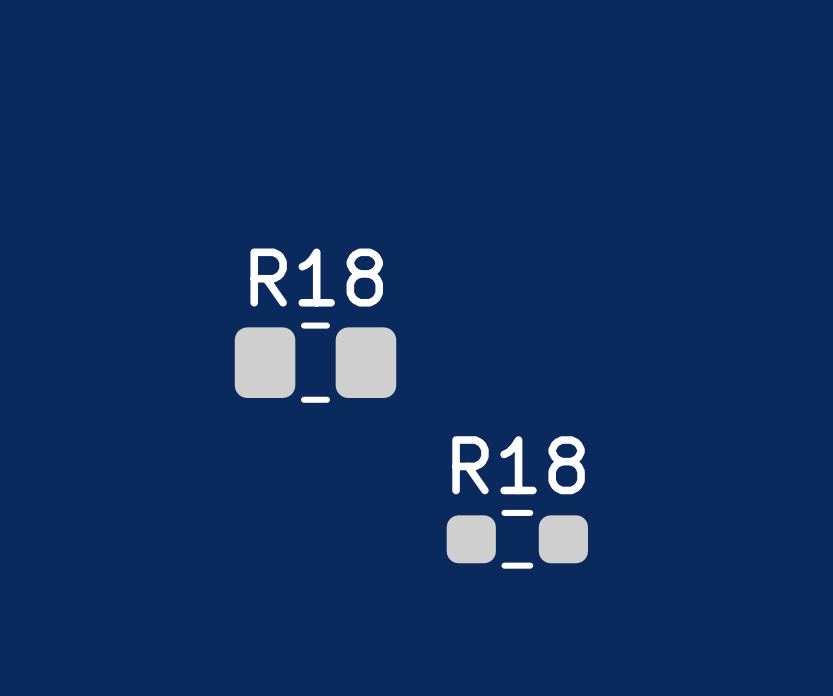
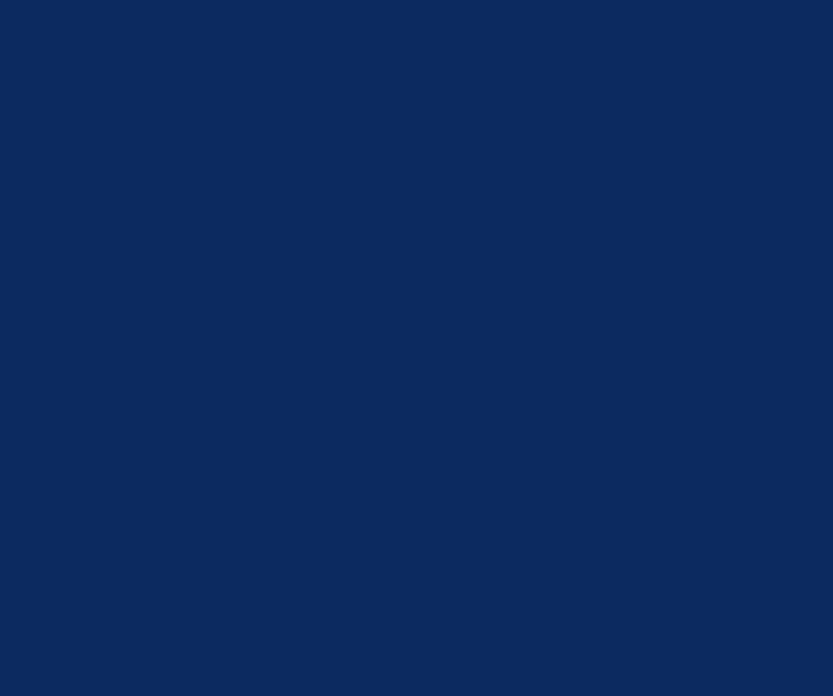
R18: (315, 362) -> none
R18: (517, 539) -> none

